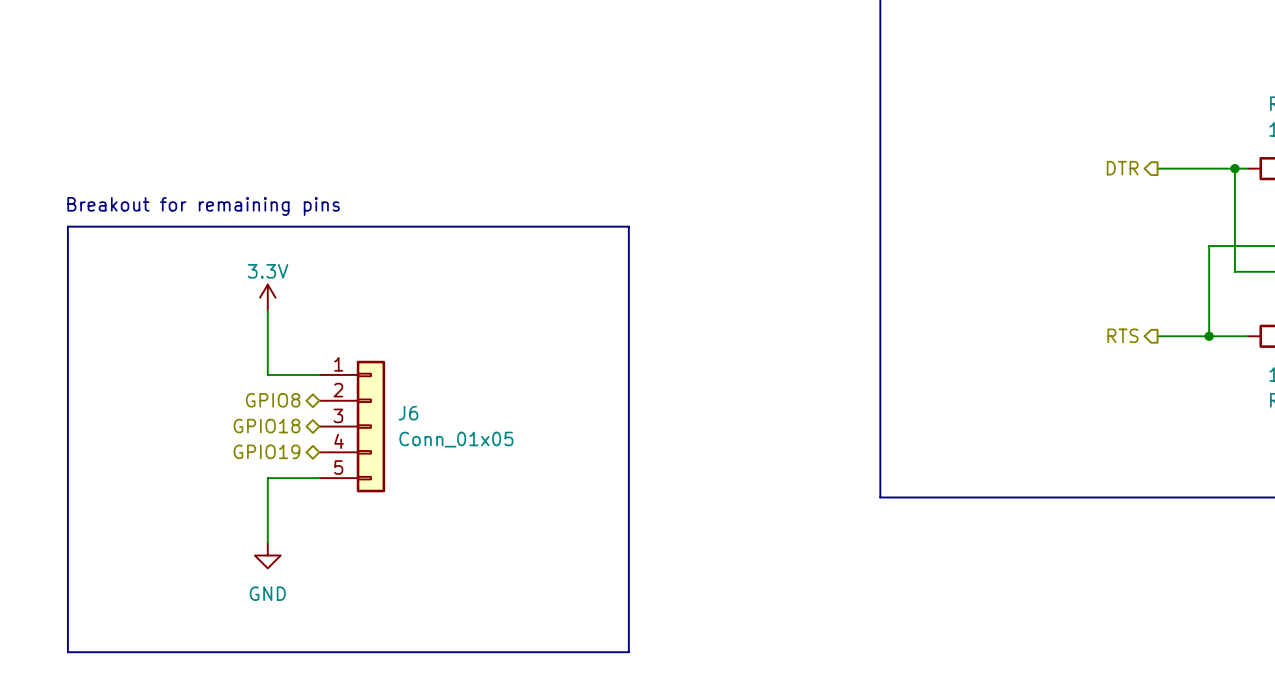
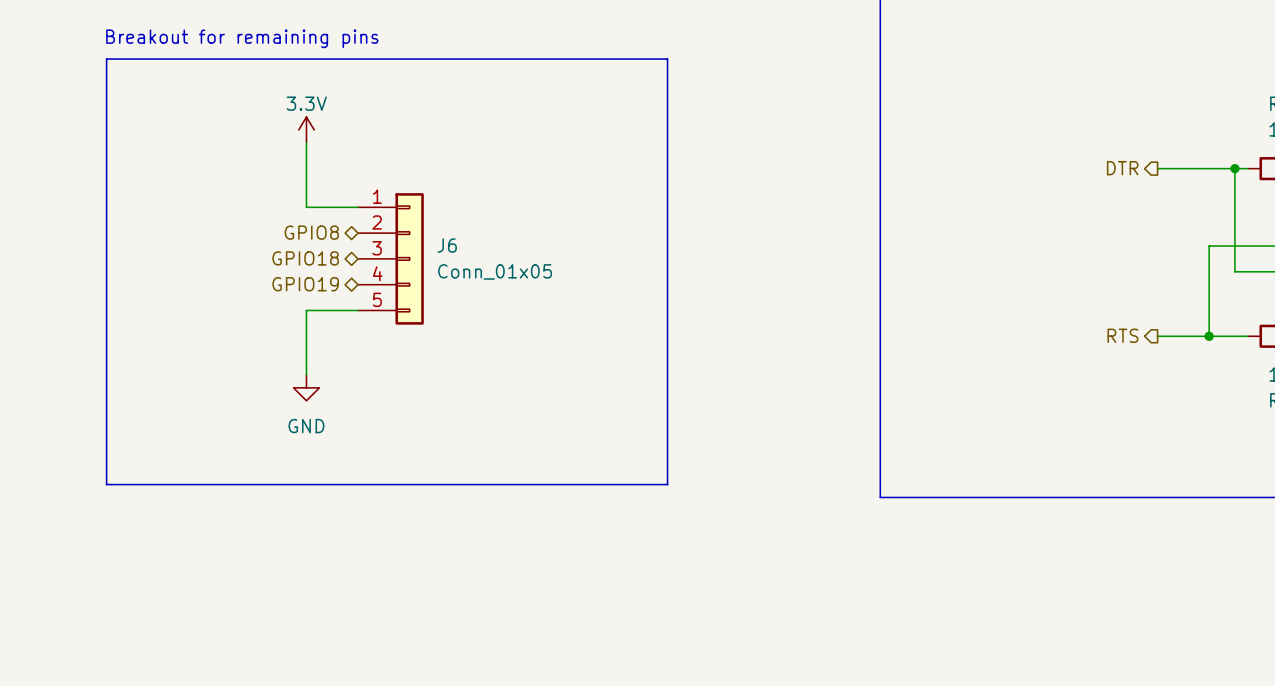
text position: Breakout for remaining pins (203, 206) -> Breakout for remaining pins (242, 38)
line: (67, 226) (628, 226) (628, 652) (67, 652) (67, 226) -> (106, 59) (667, 59) (667, 484) (106, 484) (106, 59)
power symbol position: 3.3V (267, 297) -> 3.3V (306, 129)
wire: (267, 310) (267, 374) (319, 374) -> (306, 142) (306, 207) (358, 207)
hierarchical label position: GPIO8 (273, 400) -> GPIO8 (311, 232)
hierarchical label position: GPIO18 (266, 426) -> GPIO18 (305, 258)
J6 position: (352, 426) -> (390, 258)
hierarchical label position: GPIO19 (266, 451) -> GPIO19 (305, 284)
wire: (319, 478) (267, 478) (267, 542) -> (358, 310) (306, 310) (306, 374)
power symbol position: GND (267, 555) -> GND (306, 387)

